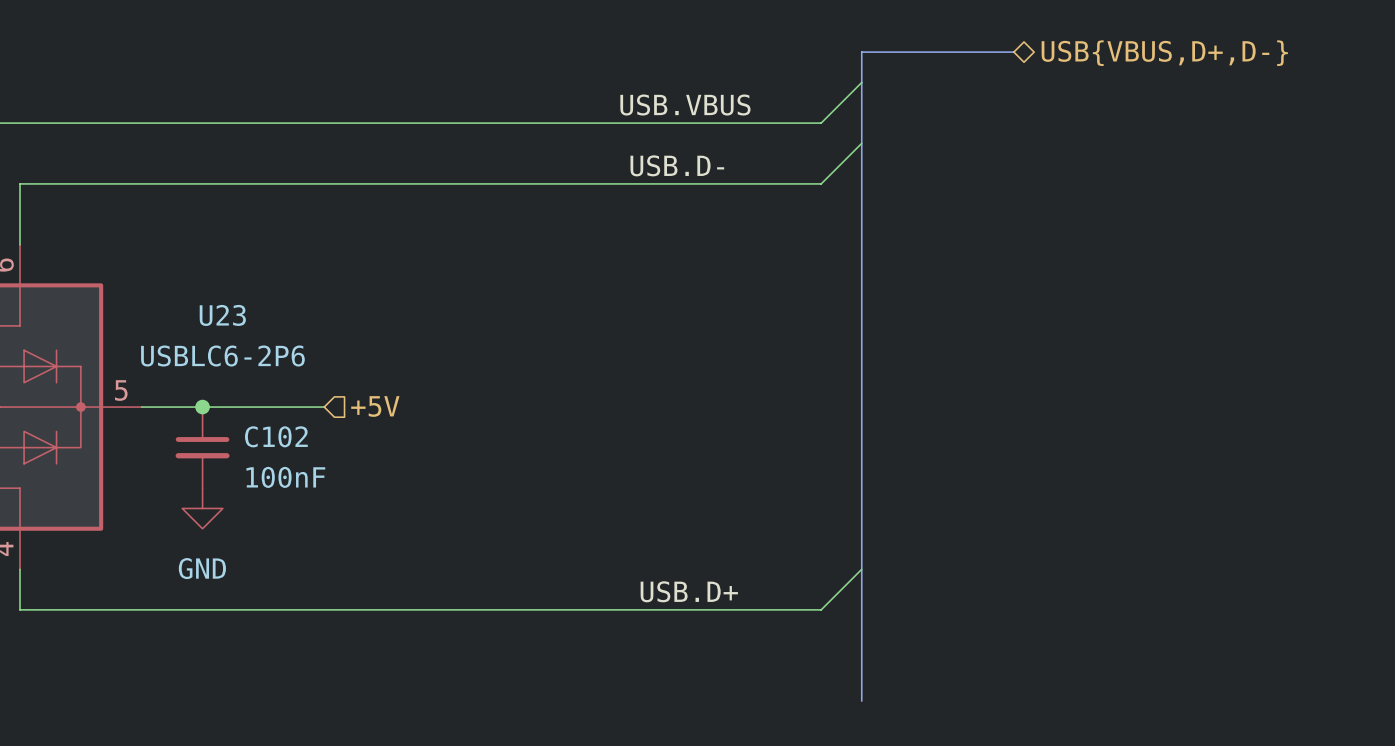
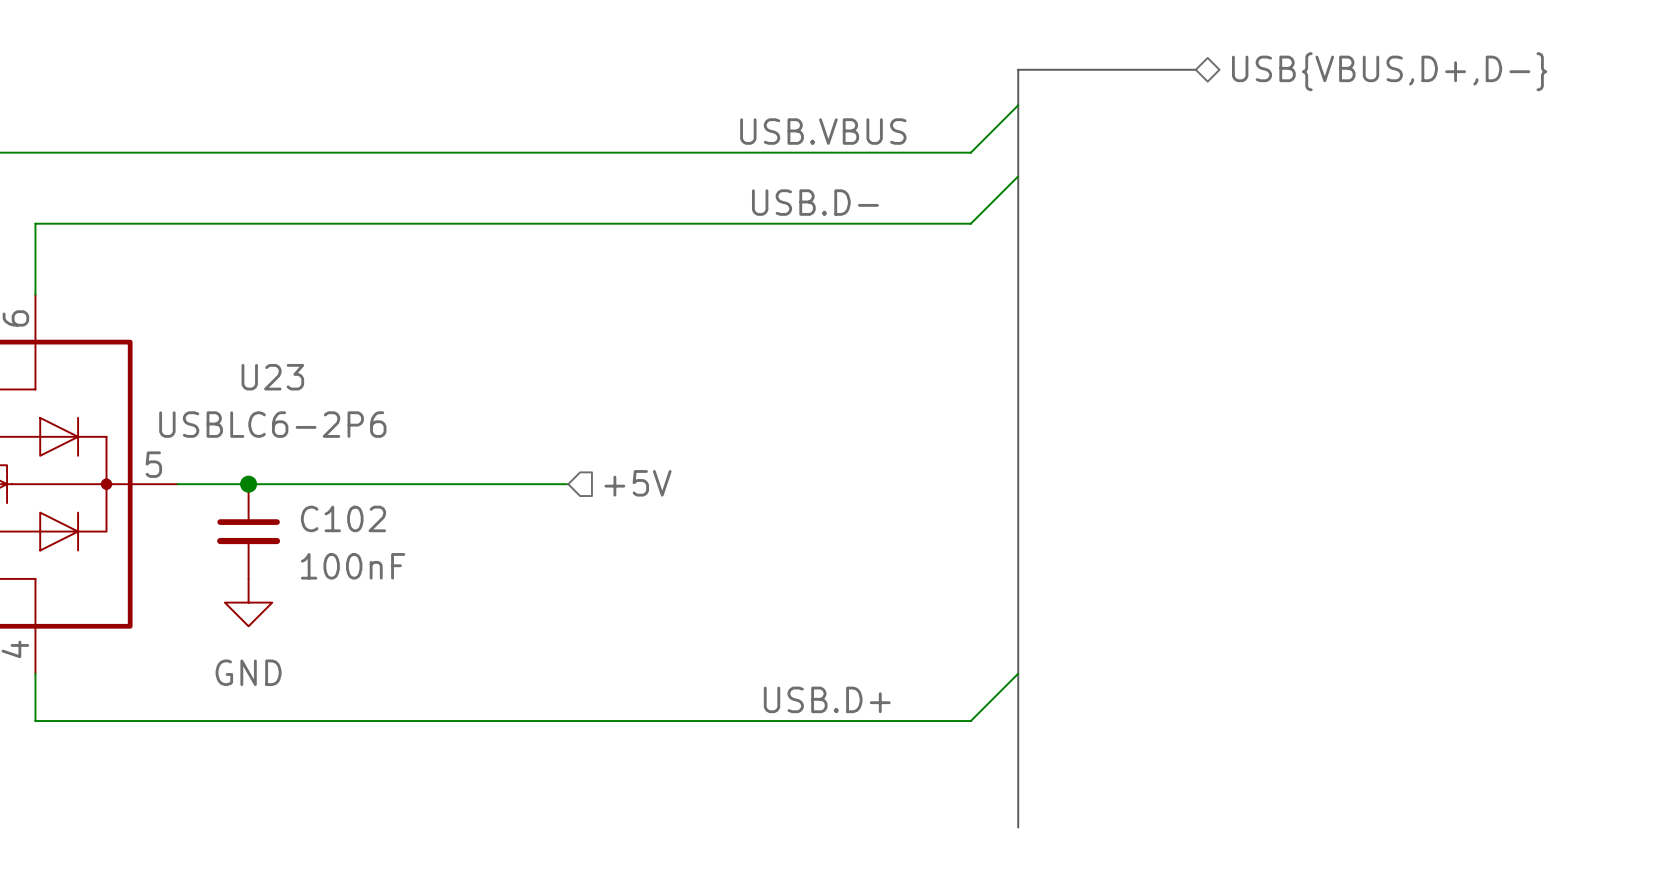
hierarchical label position: +5V (375, 406) -> +5V (638, 483)
wire: none -> (390, 484) (568, 484)

